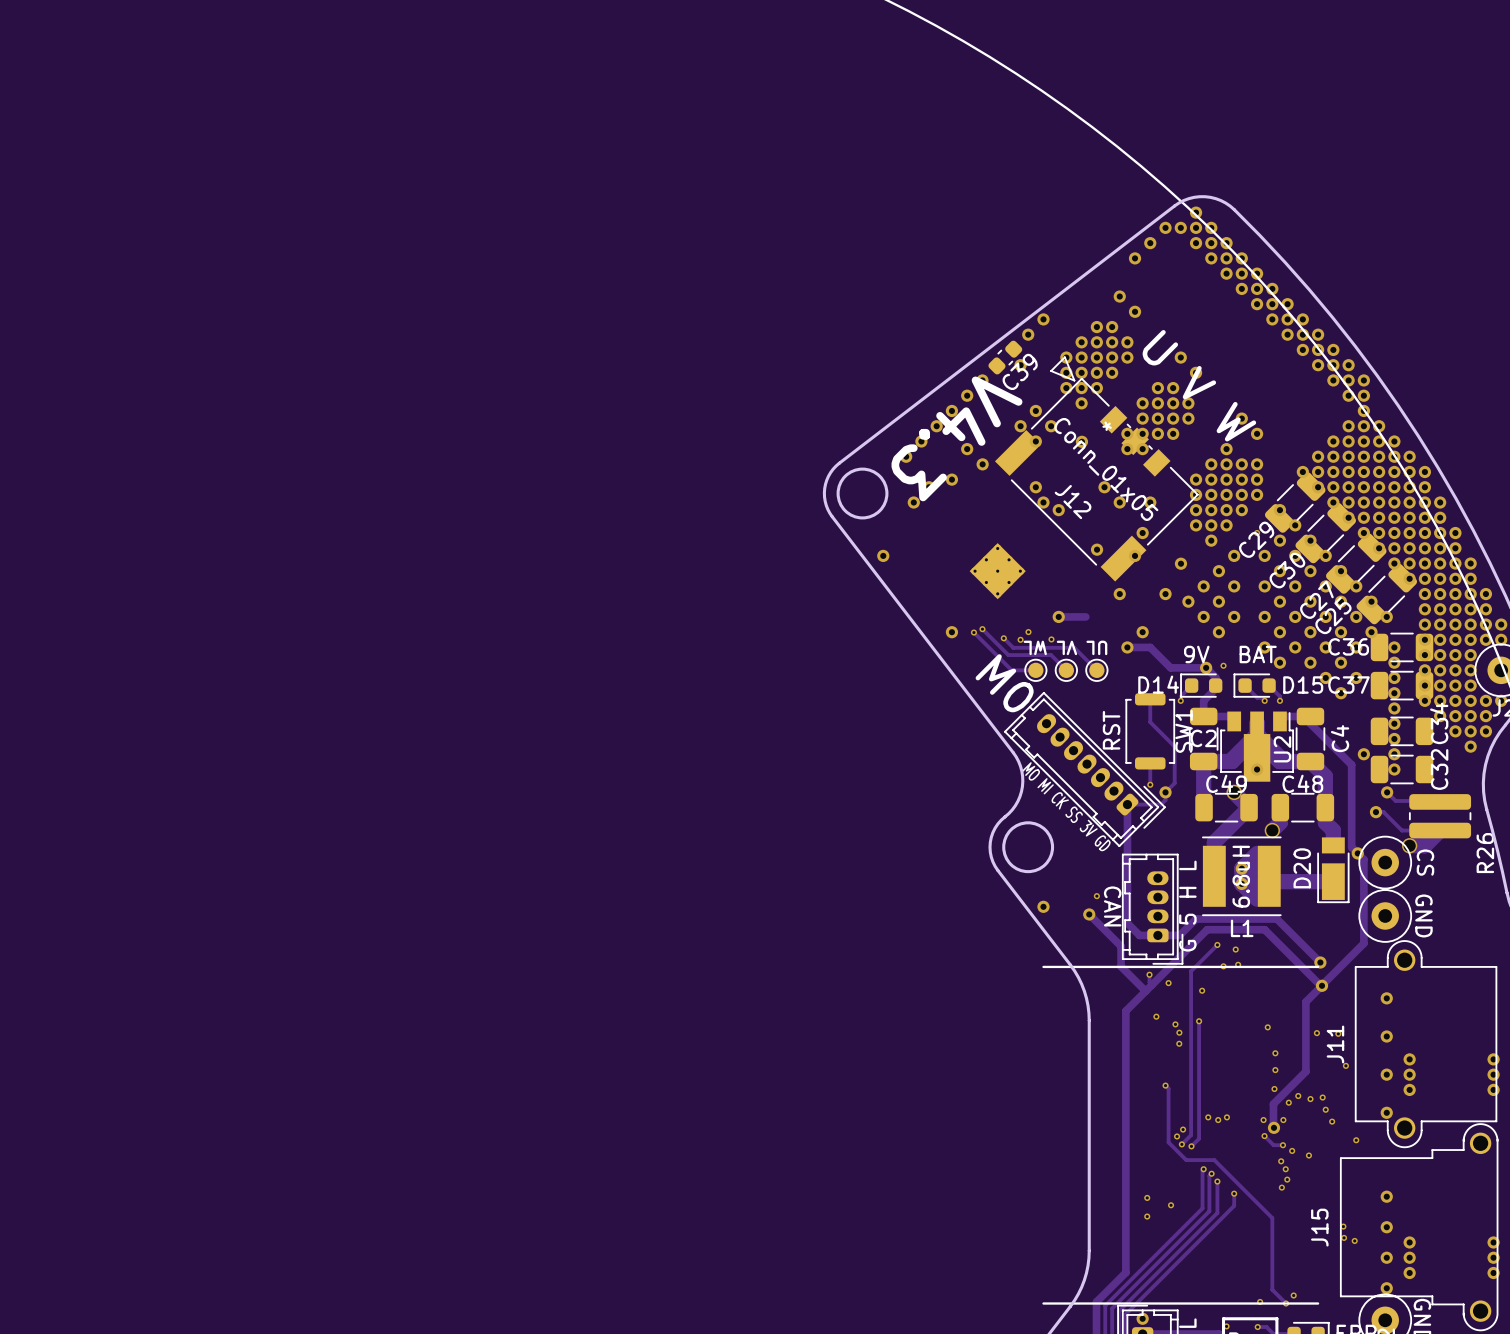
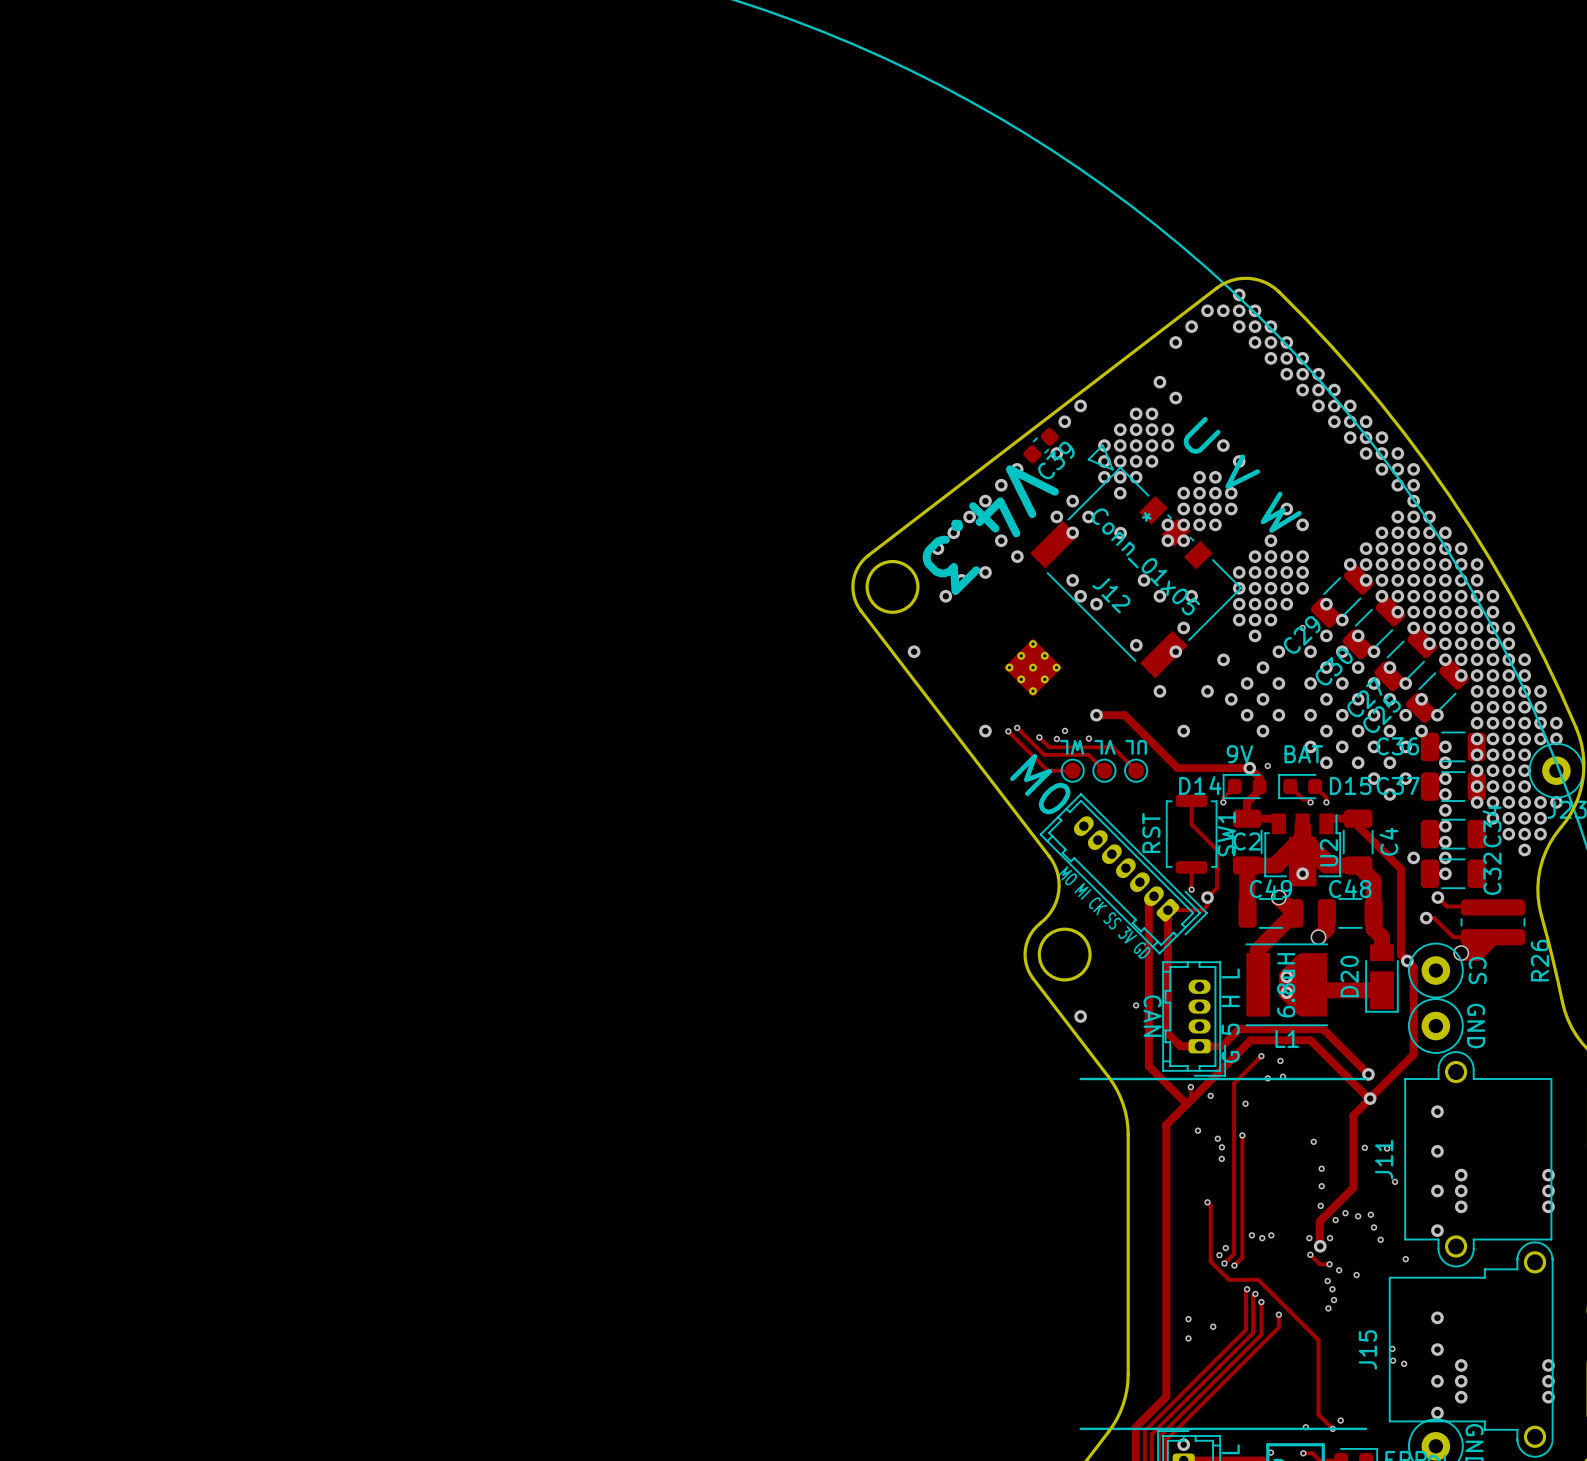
track: (1127, 647) (1150, 647) (1170, 667) -> (1124, 715) (1177, 768) (1212, 768)
via: (1127, 647) -> none
track: (1089, 914) (1121, 946) (1121, 966) -> (1153, 896) (1148, 901) (1148, 1066) (1161, 1078)
via: (1089, 914) -> none

